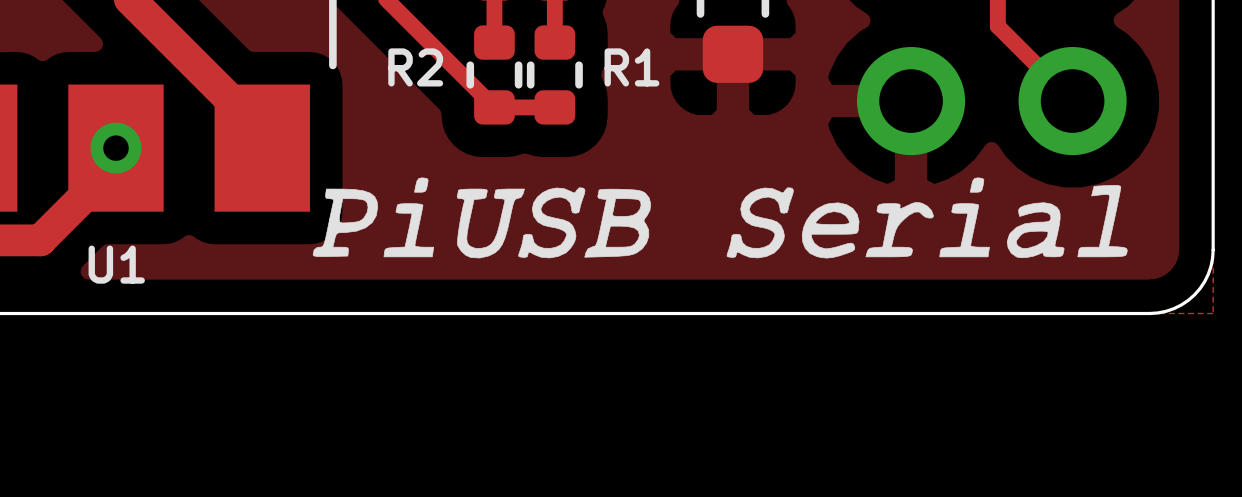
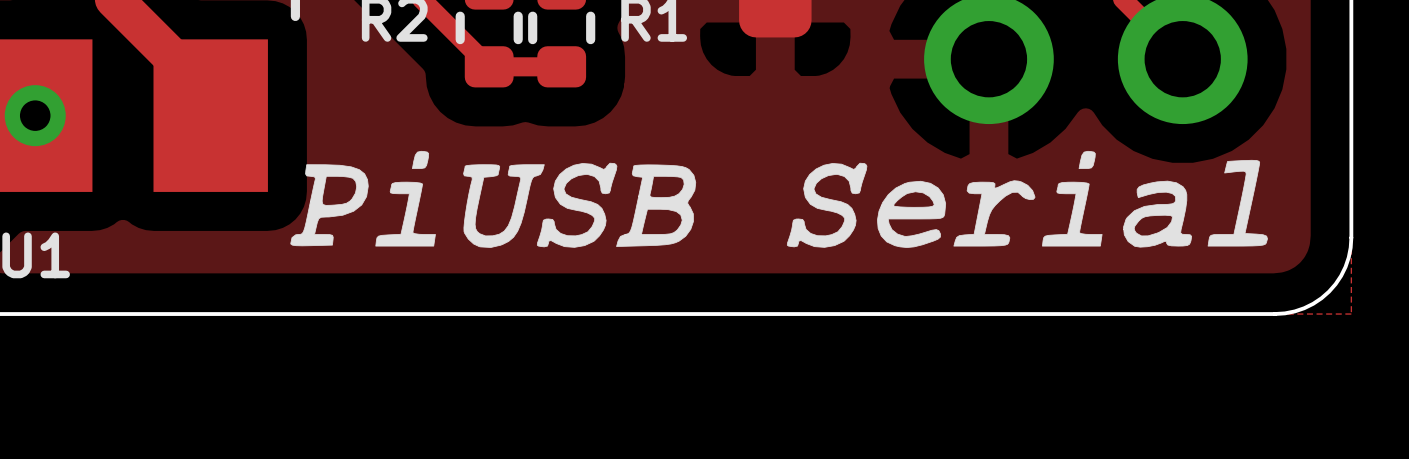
drawing position: (720, 217) -> (779, 199)

